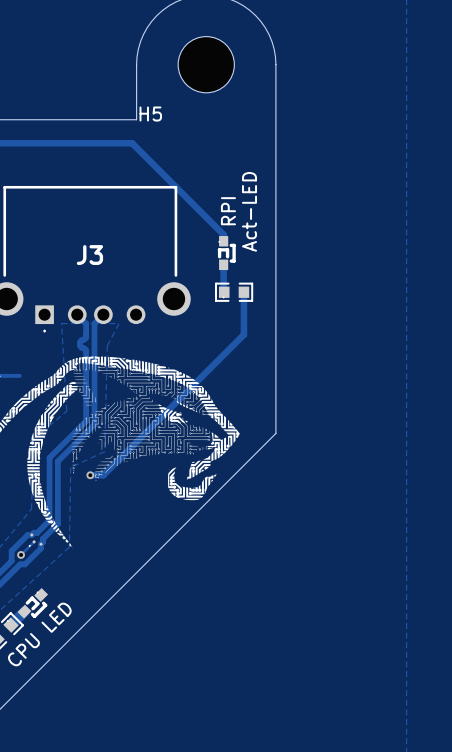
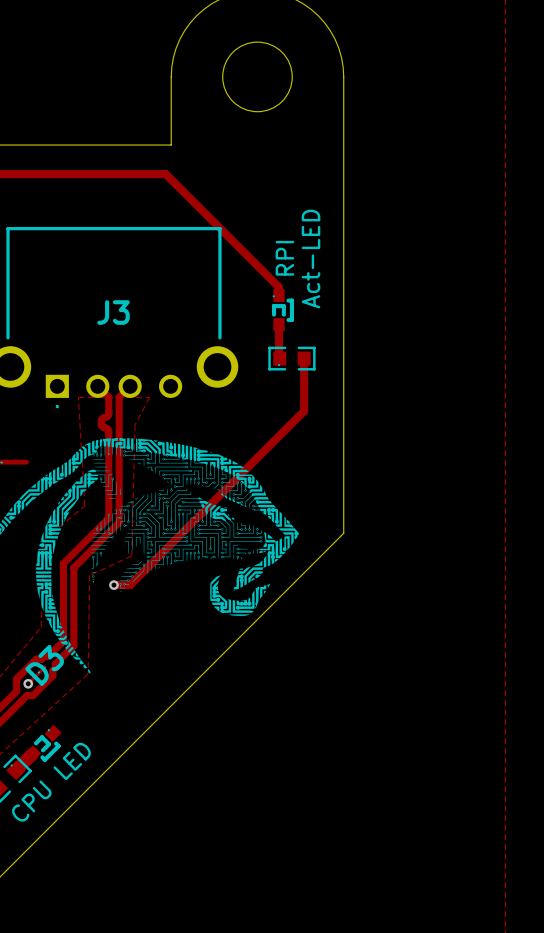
H5 name: H5 (150, 114) -> none
D3 name: none -> D3 (44, 665)

